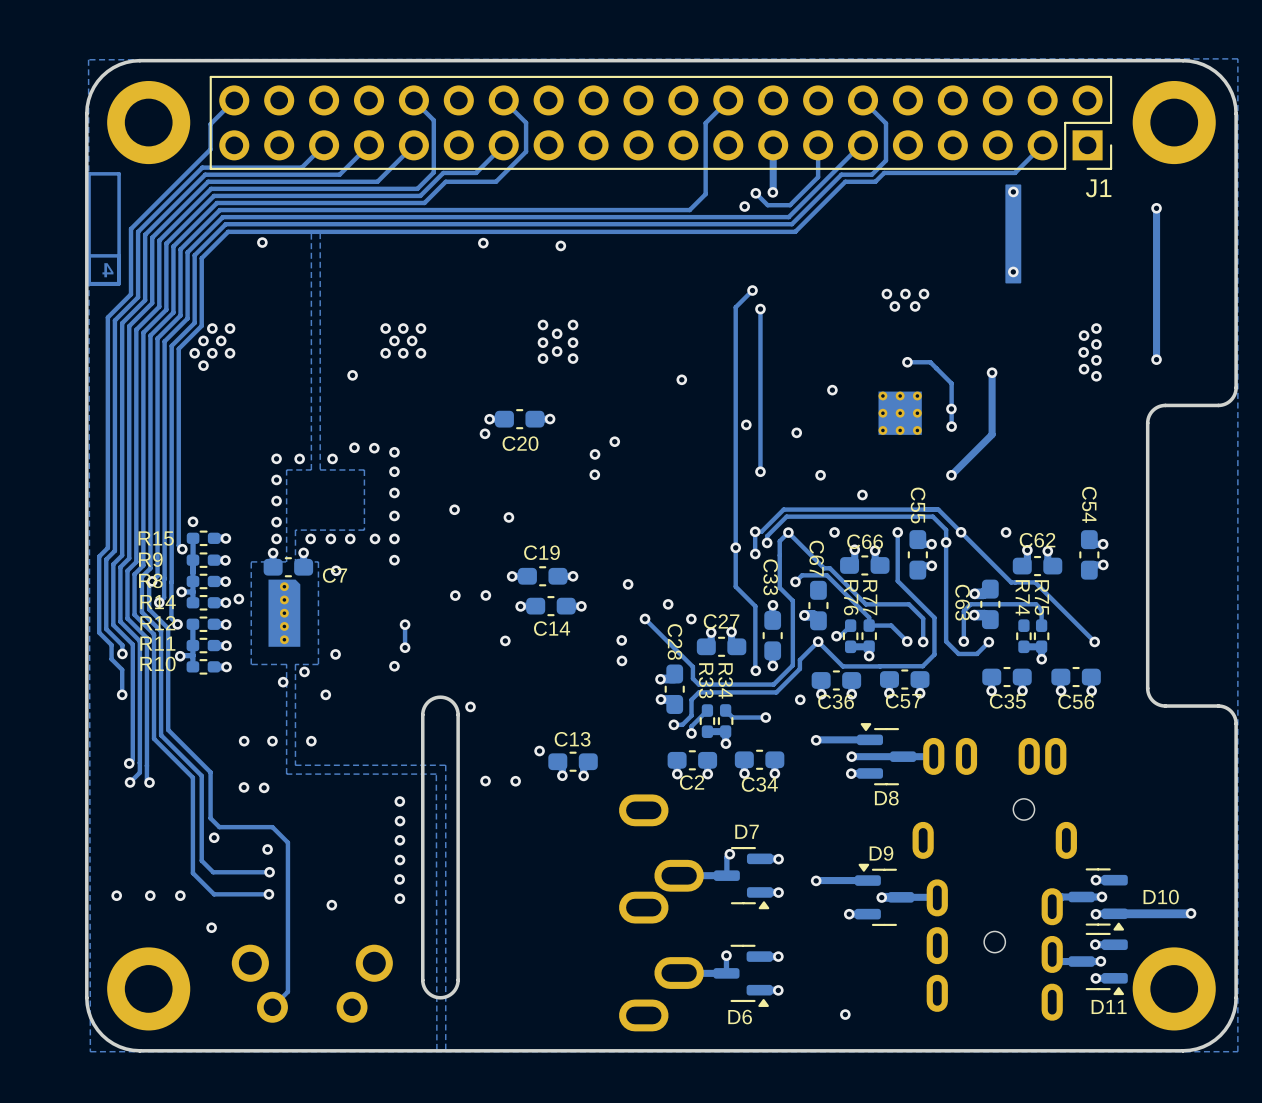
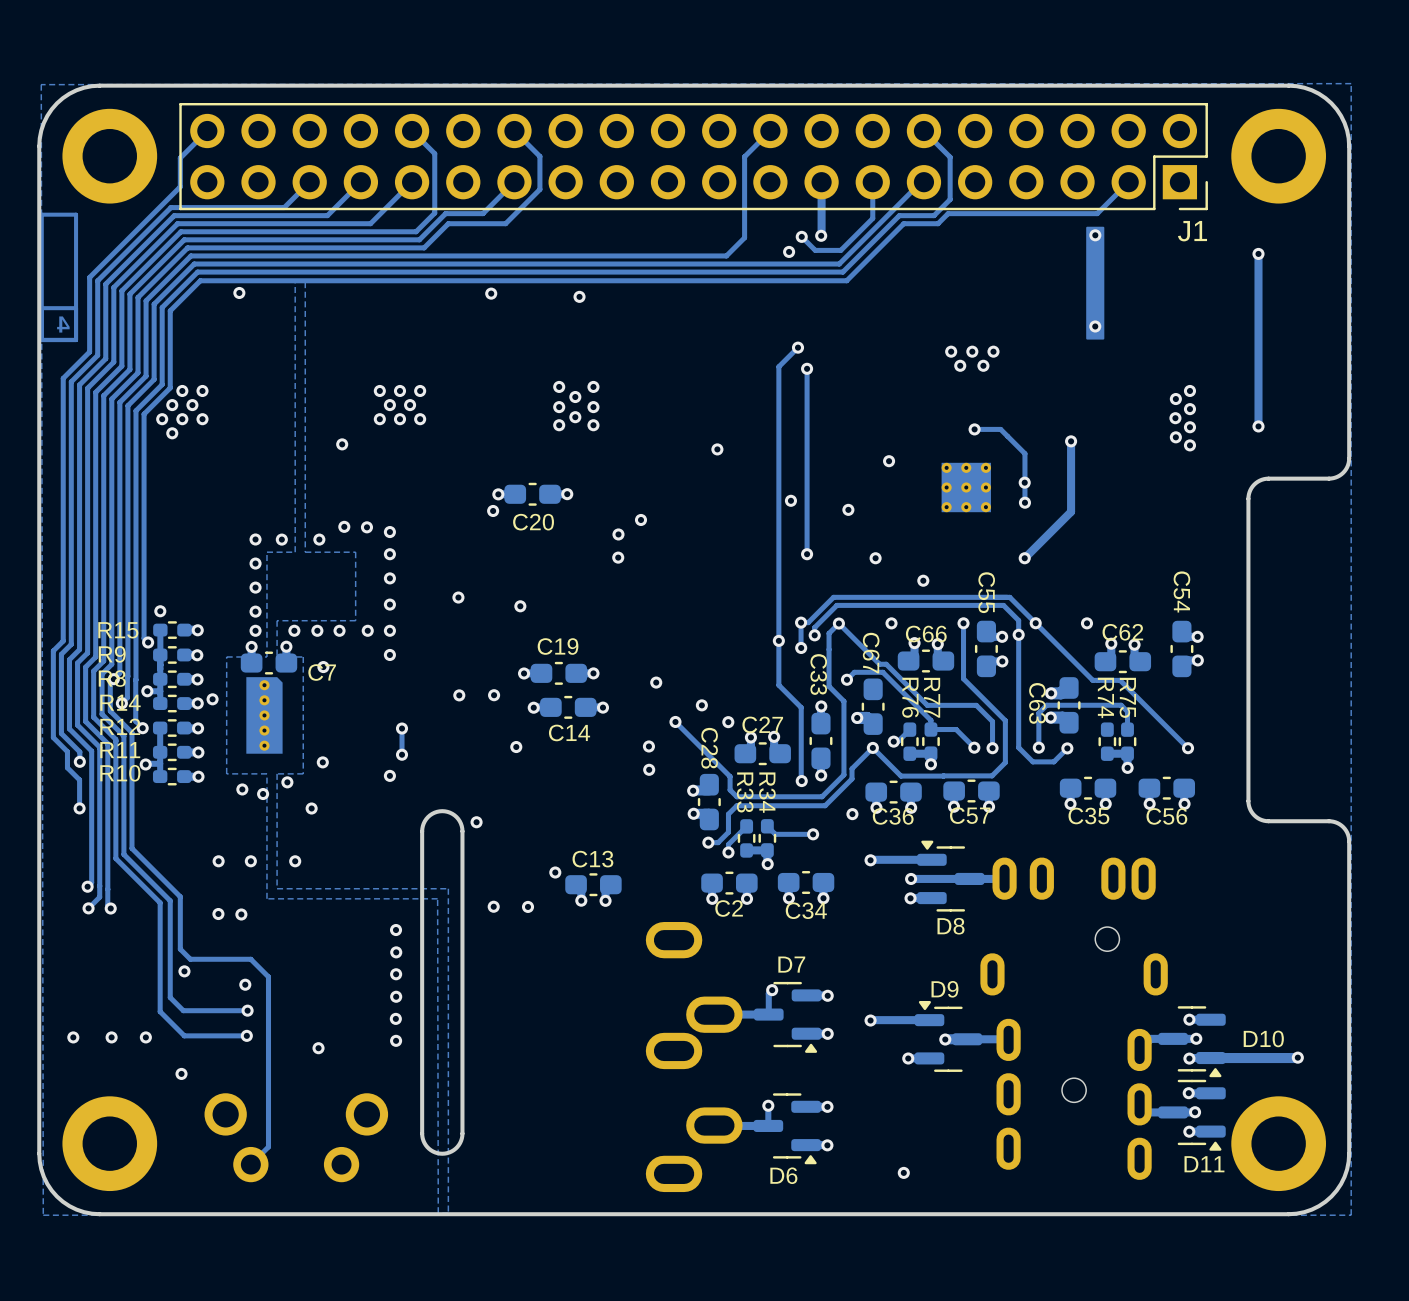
via: none -> (242, 789)

